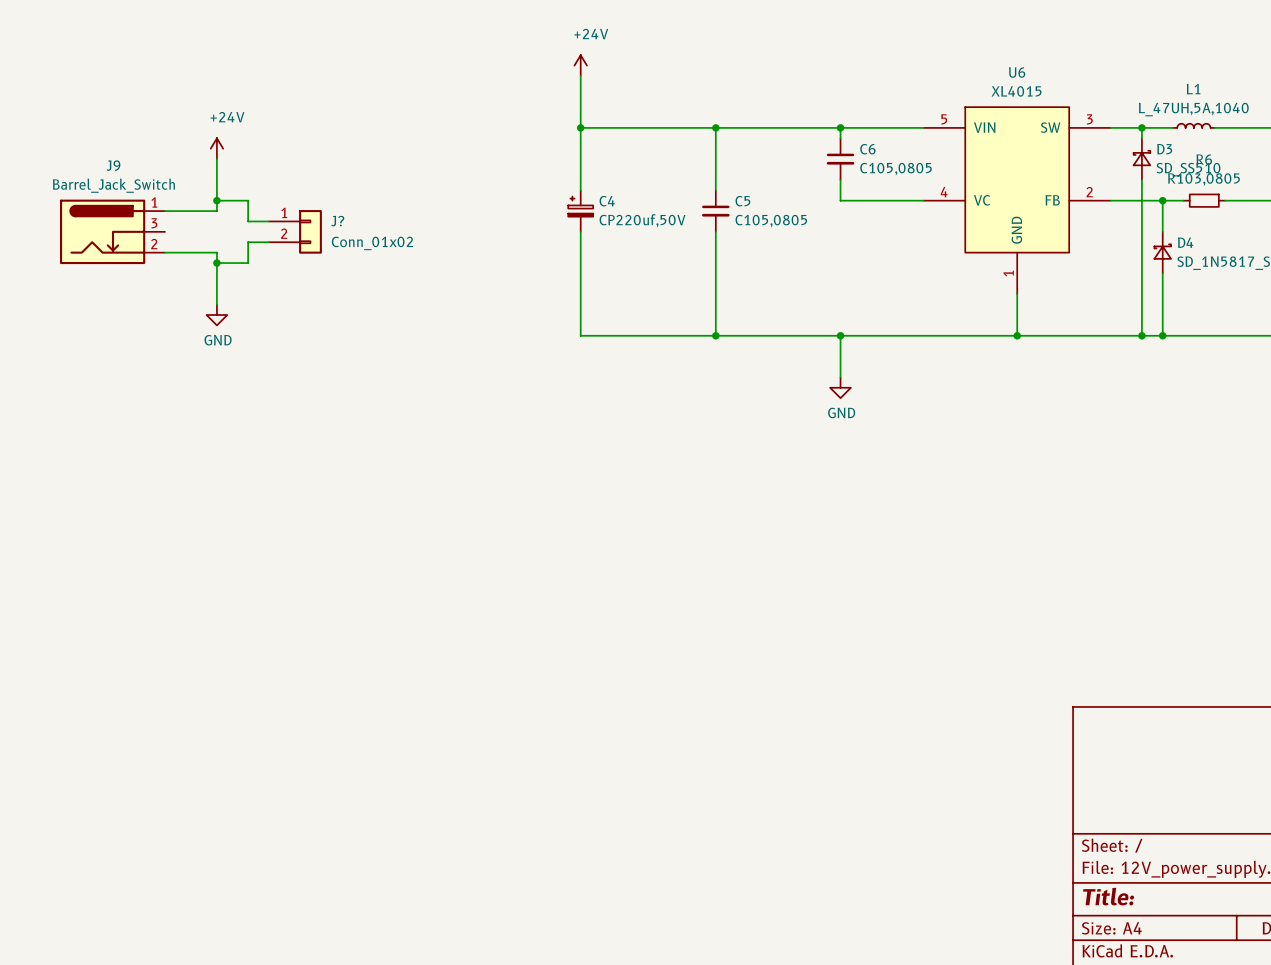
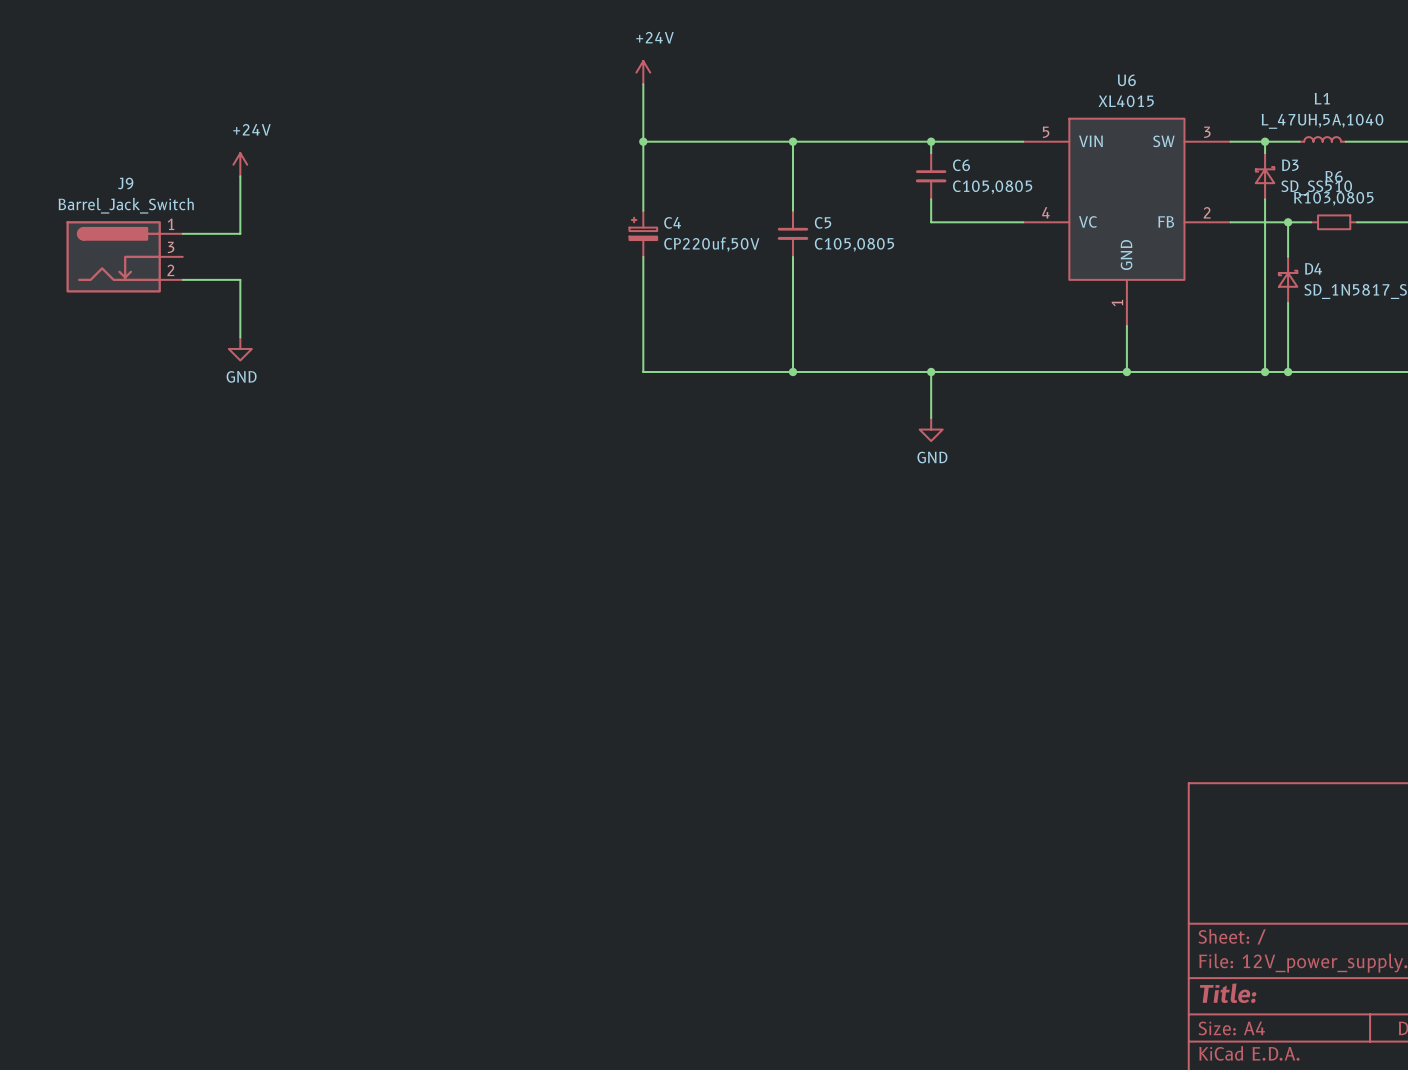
wire: (216, 200) (248, 200) (248, 221) (268, 221) -> none
junction: (216, 200) -> none
J?: Conn_01x02 (295, 231) -> none
wire: (268, 242) (248, 242) (248, 263) (216, 263) -> none
junction: (216, 263) -> none

